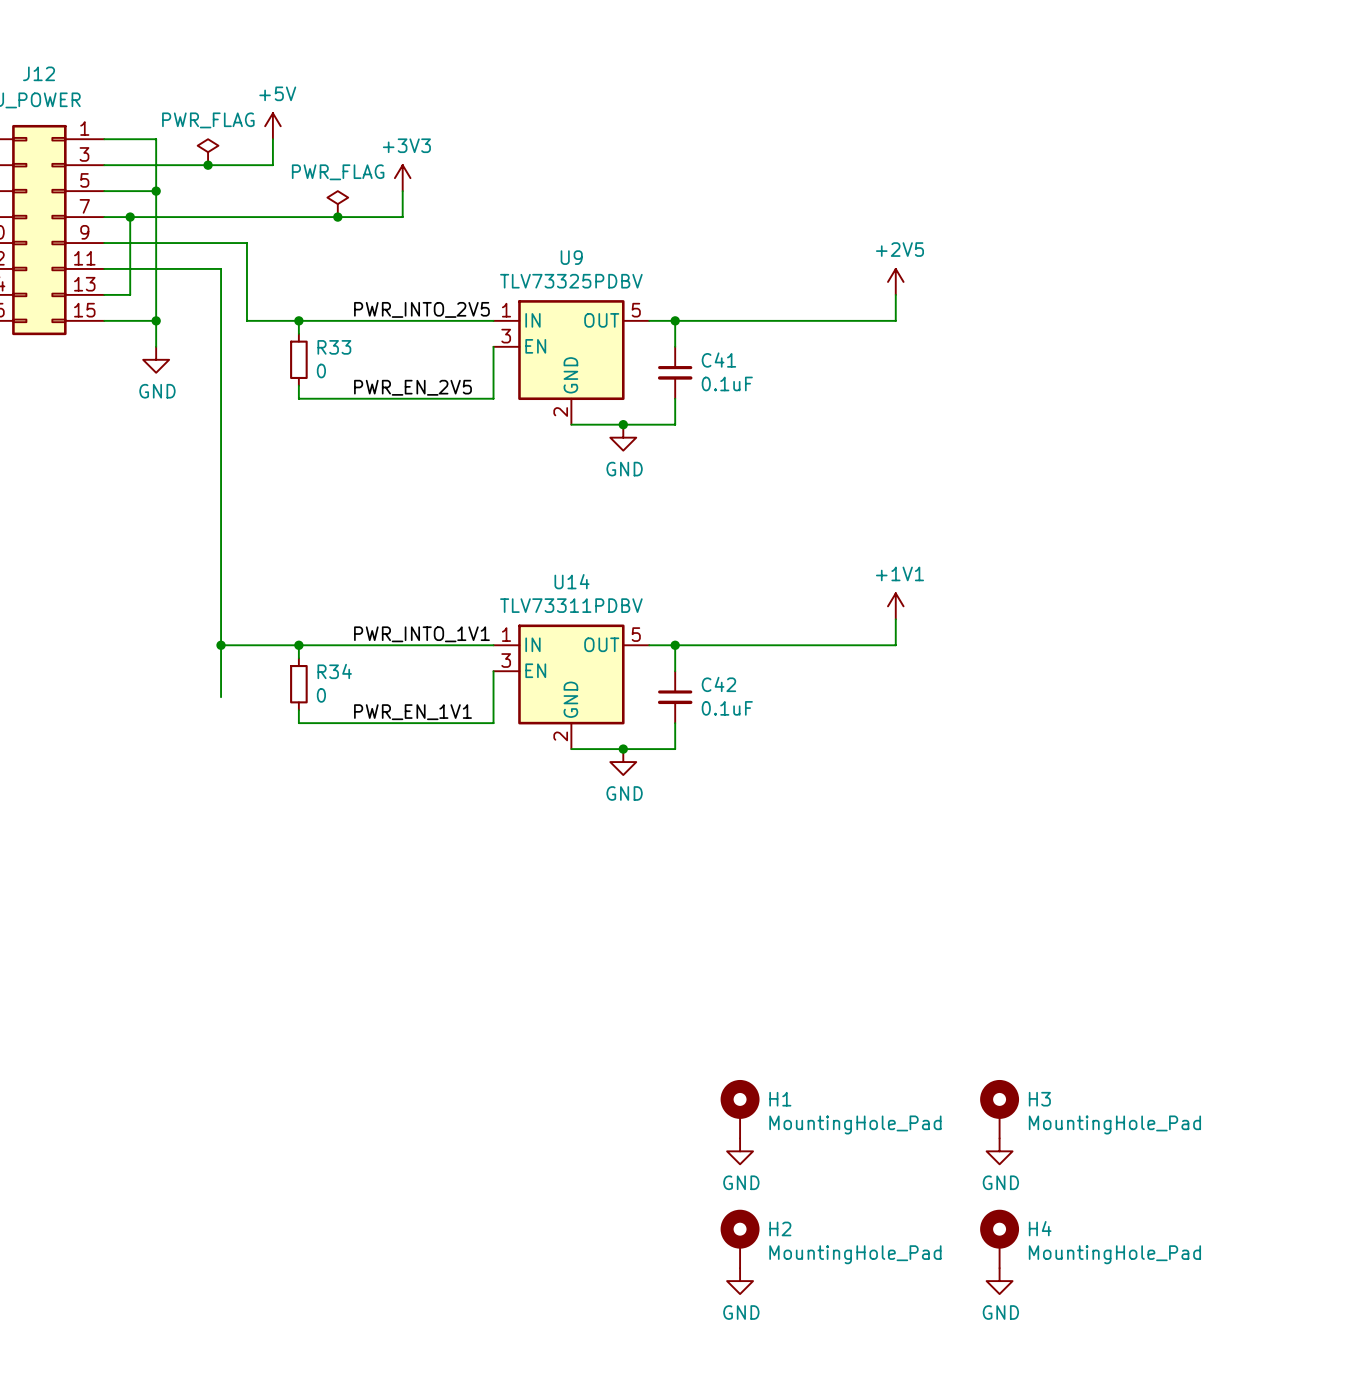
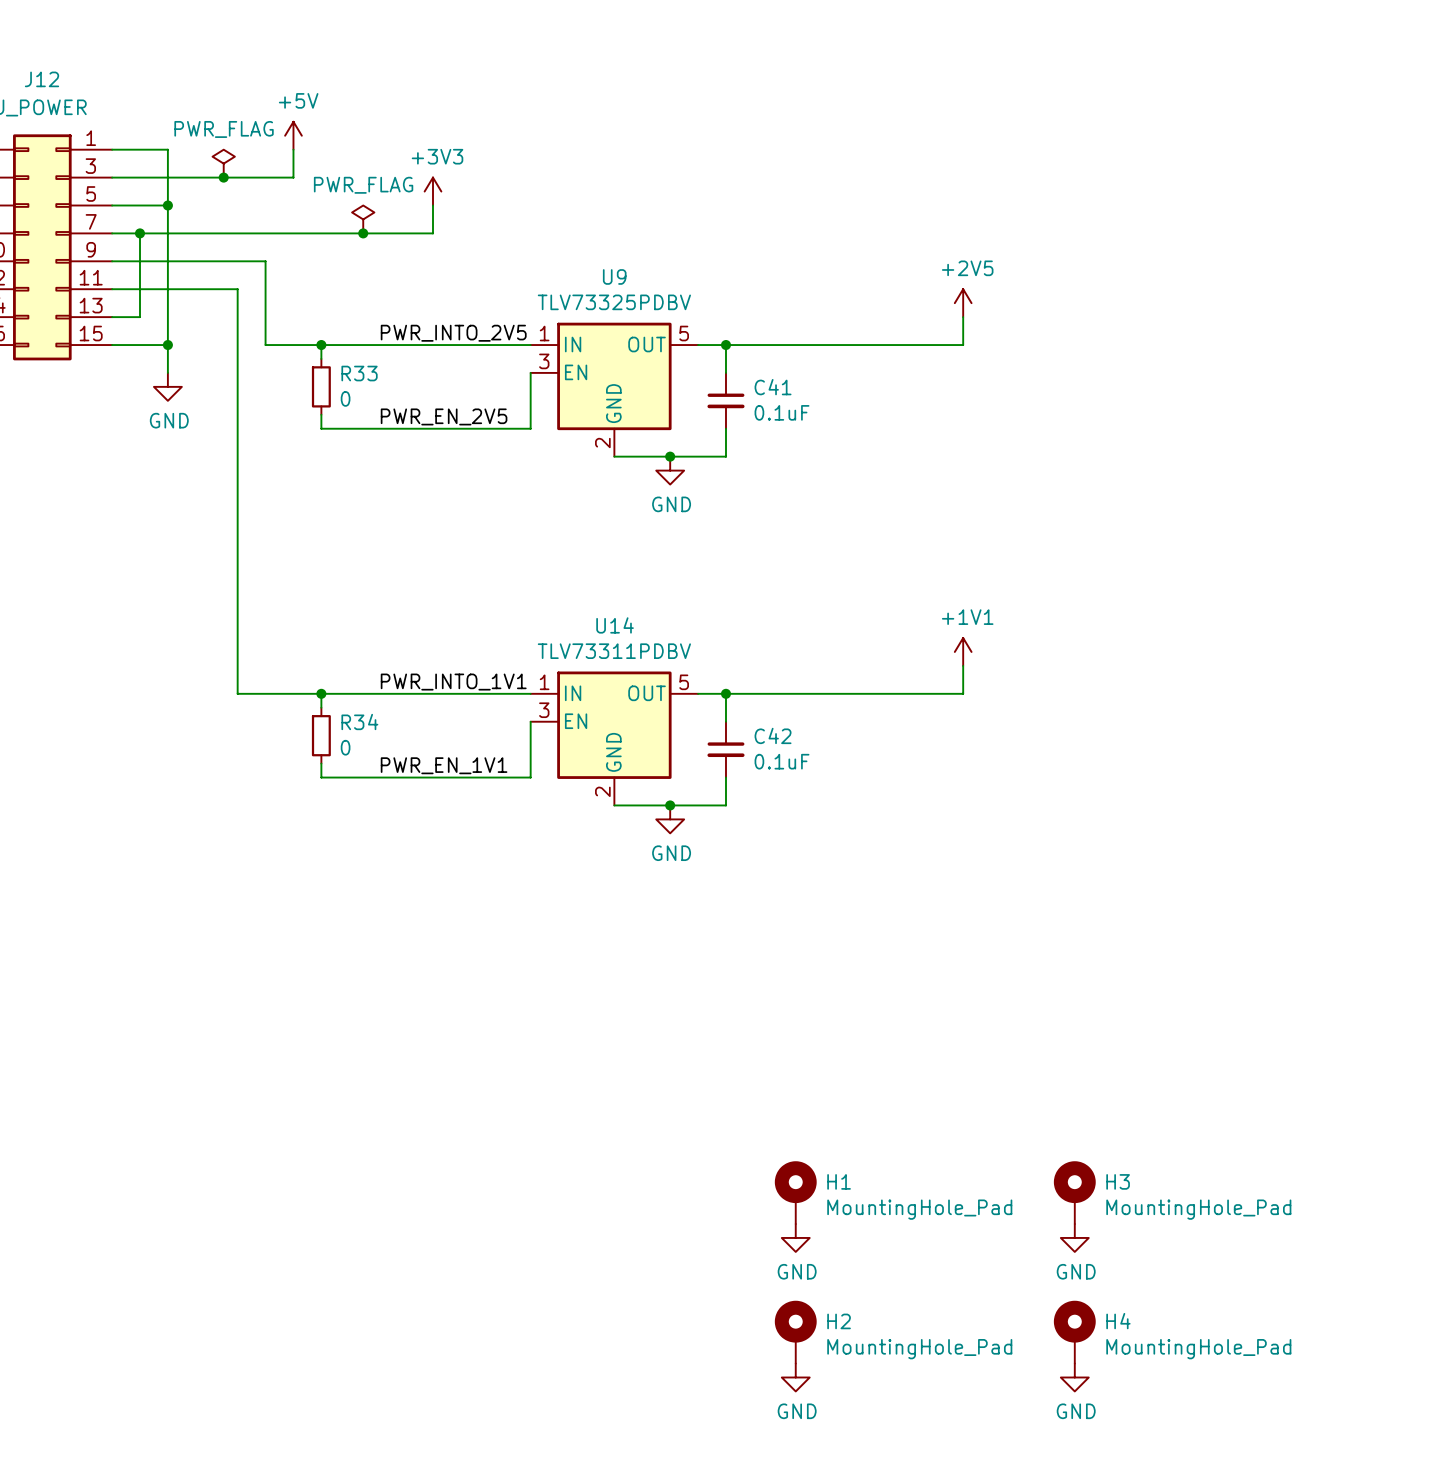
wire: (221, 645) (221, 697) -> none
junction: (221, 645) -> none

